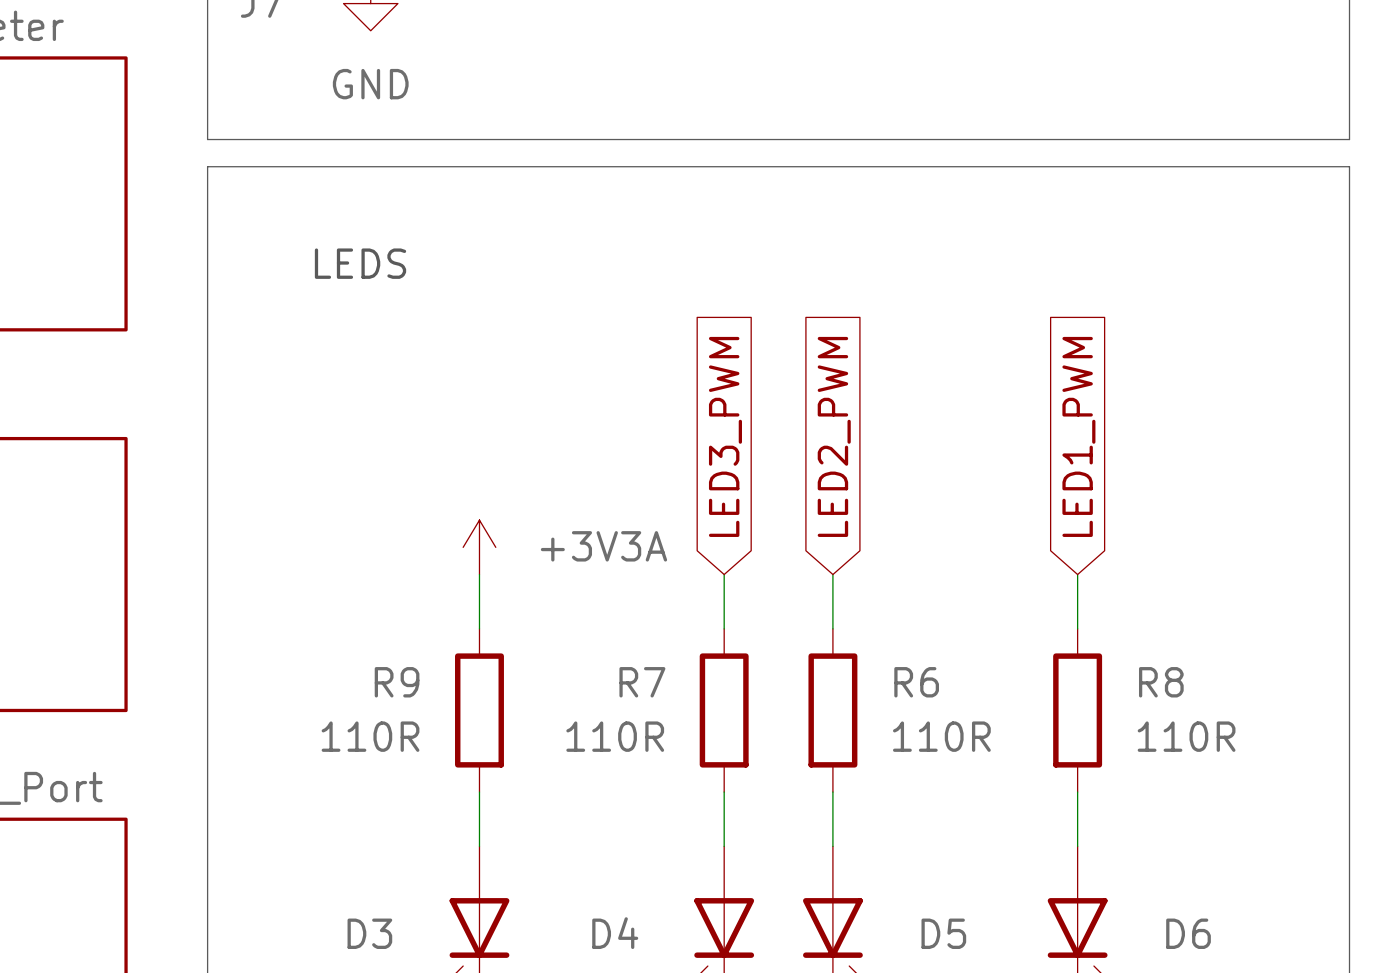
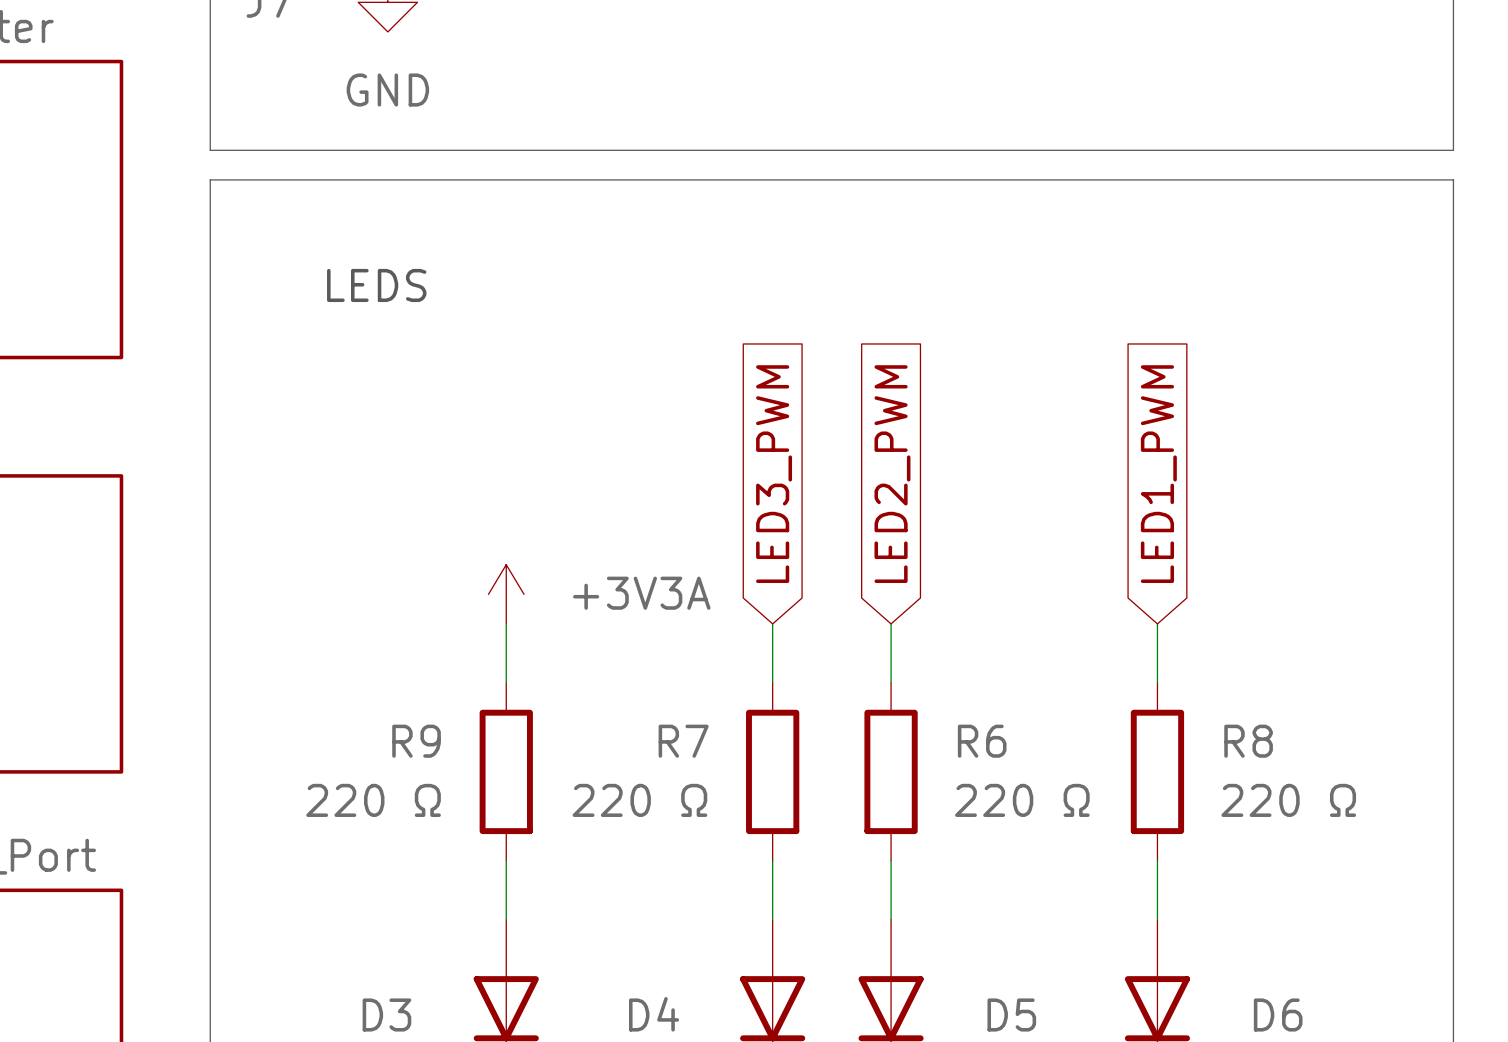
R9 value: 110R (370, 736) -> 220 Ω (373, 800)
R7 value: 110R (615, 736) -> 220 Ω (639, 800)
R6 value: 110R (941, 736) -> 220 Ω (1022, 800)
R8 value: 110R (1186, 736) -> 220 Ω (1288, 800)

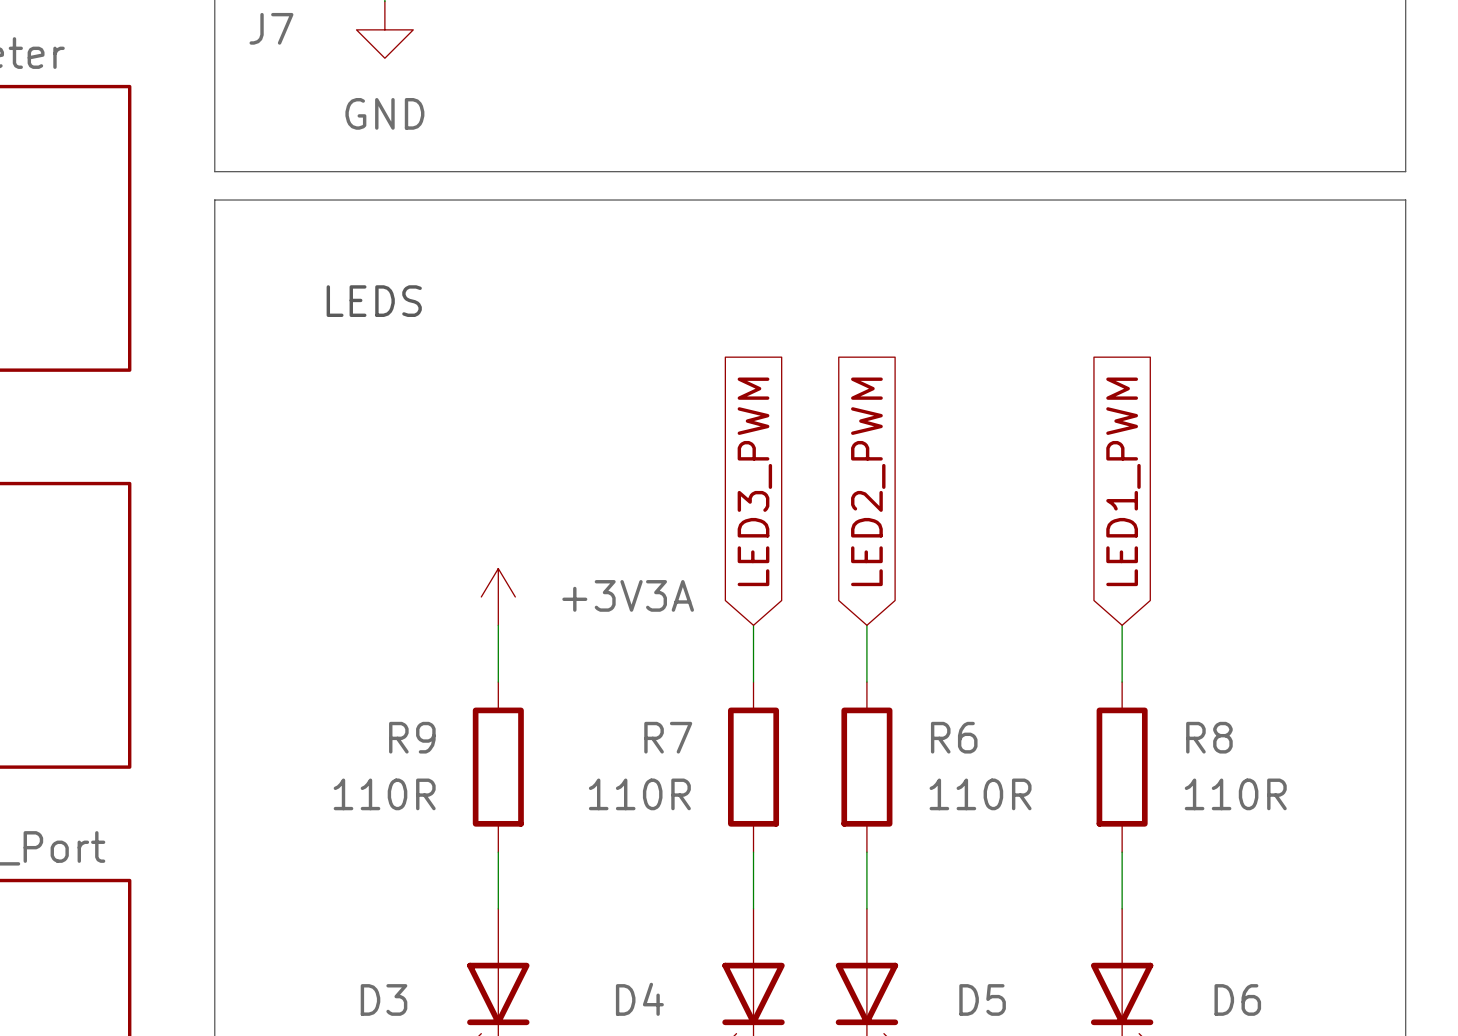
R9 value: 220 Ω (373, 800) -> 110R (384, 794)
R7 value: 220 Ω (639, 800) -> 110R (639, 794)
R6 value: 220 Ω (1022, 800) -> 110R (980, 794)
R8 value: 220 Ω (1288, 800) -> 110R (1235, 794)

